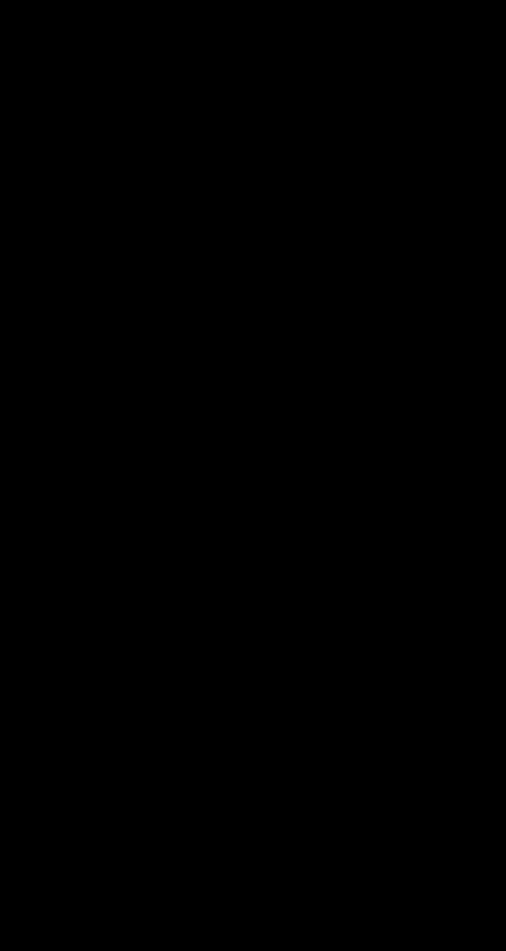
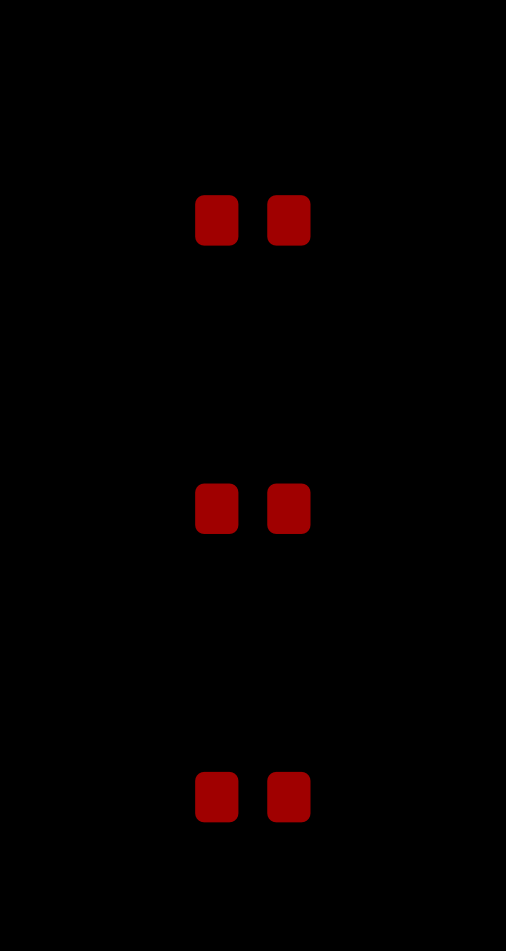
part: none -> (252, 220)
part: none -> (252, 508)
part: none -> (252, 797)

